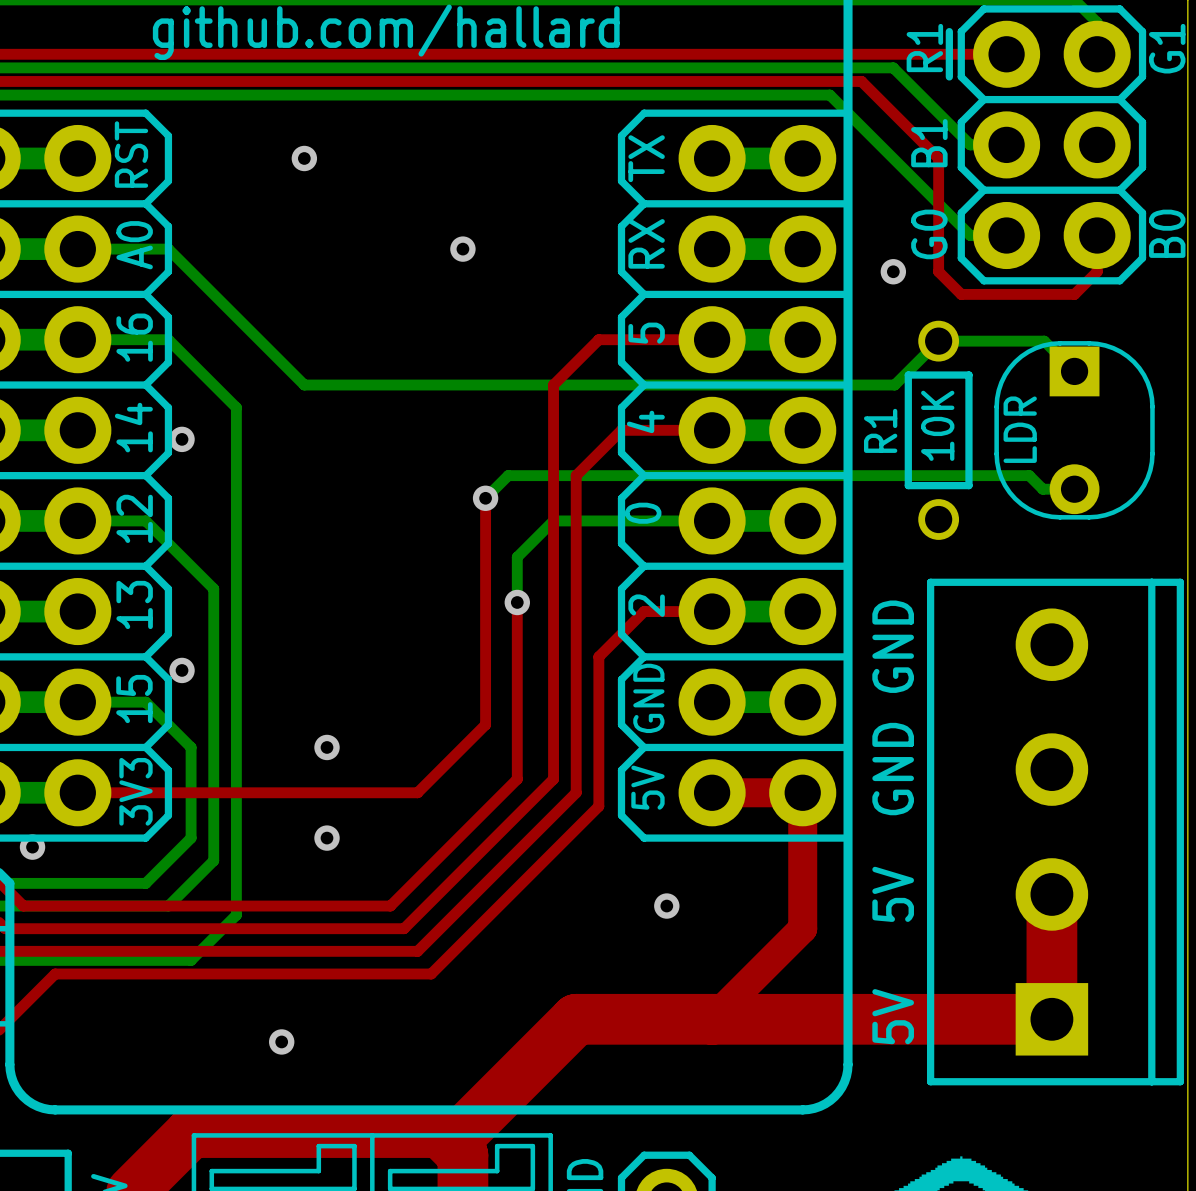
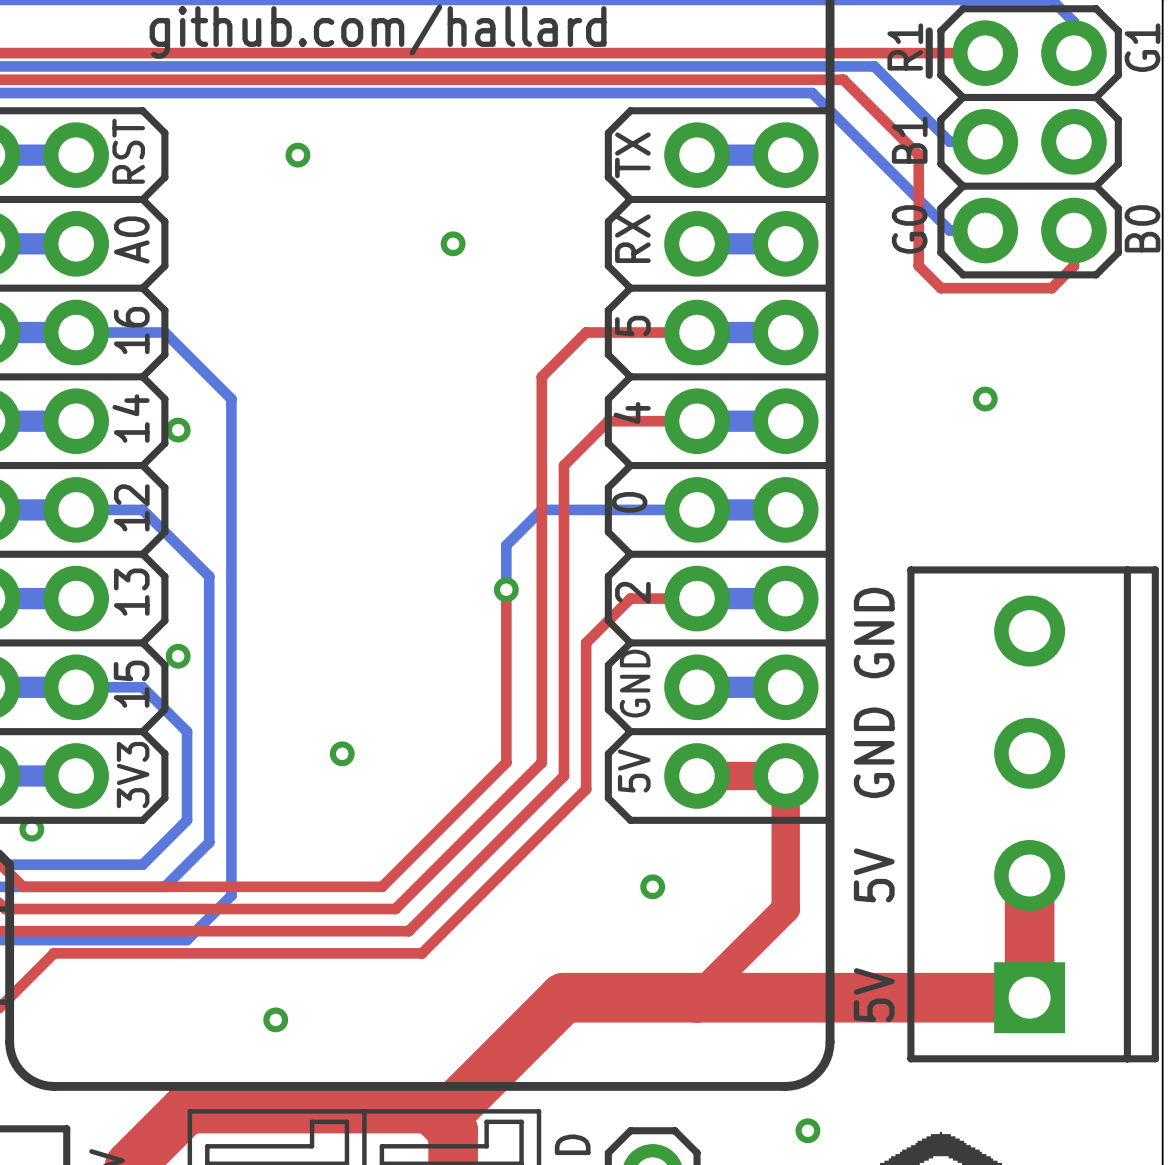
bottom track: (77, 249) (168, 249) (304, 385) (894, 385) (938, 341) (1044, 341) (1074, 371) -> none
via position: (893, 271) -> (985, 399)
R1: 10K (938, 430) -> none
part: LDR (1074, 430) -> none
bottom track: (1074, 489) (1042, 489) (1029, 475) (508, 475) (485, 498) -> none
top track: (485, 498) (485, 724) (417, 792) (77, 792) -> none
via: (485, 498) -> none
via position: (327, 747) -> (342, 753)
via: (327, 838) -> none
via: none -> (807, 1130)

